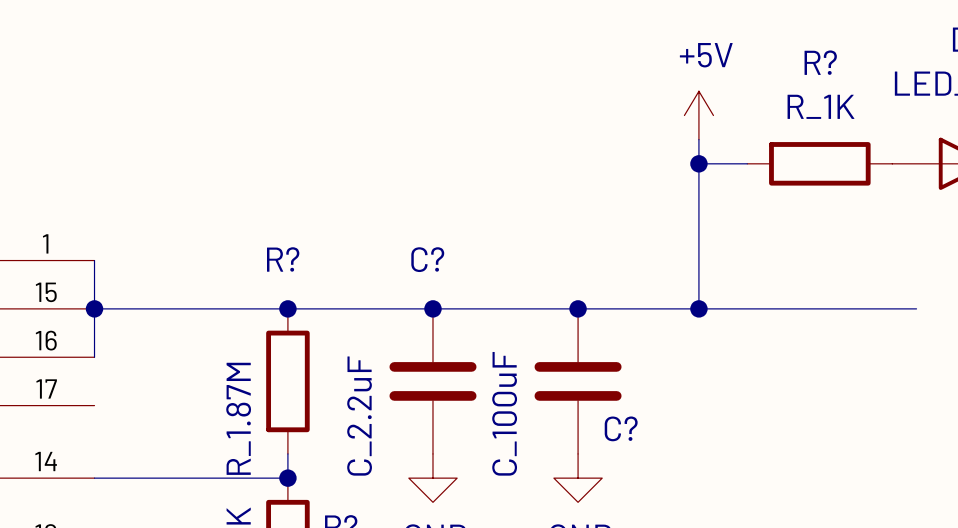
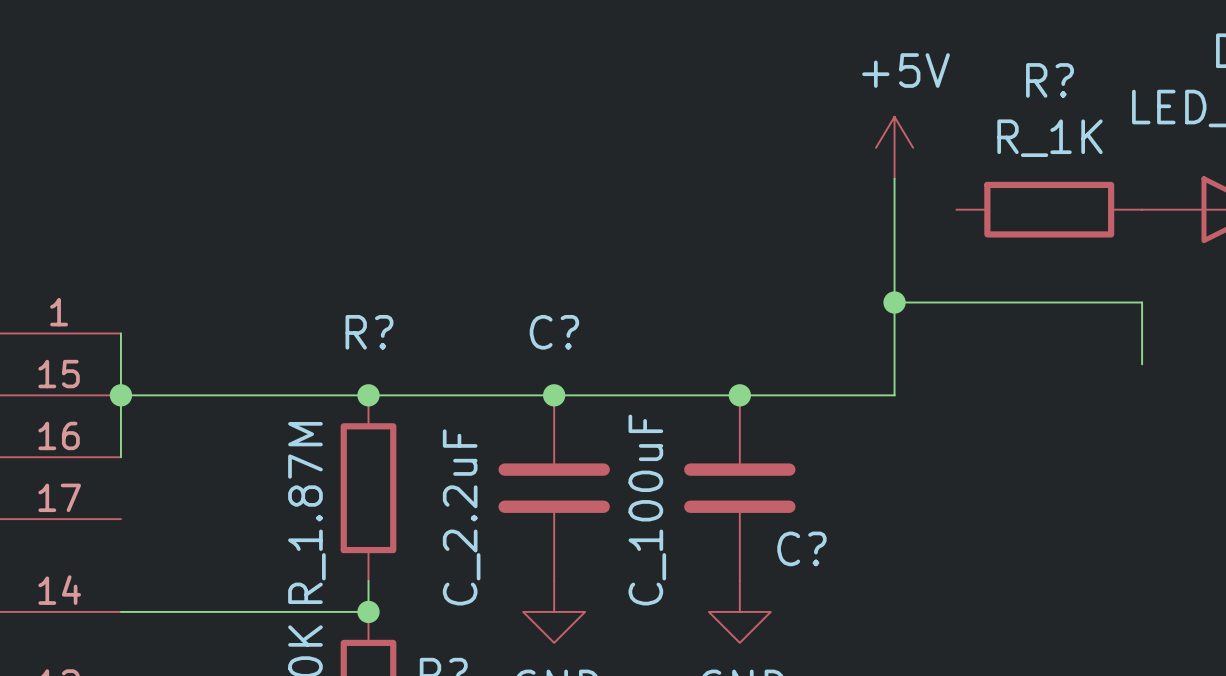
wire: (698, 163) (747, 163) -> none
junction: (698, 163) -> none
wire: none -> (894, 302) (1142, 302) (1142, 364)
junction: none -> (894, 302)
wire: (698, 308) (916, 308) -> none
junction: (698, 308) -> none

